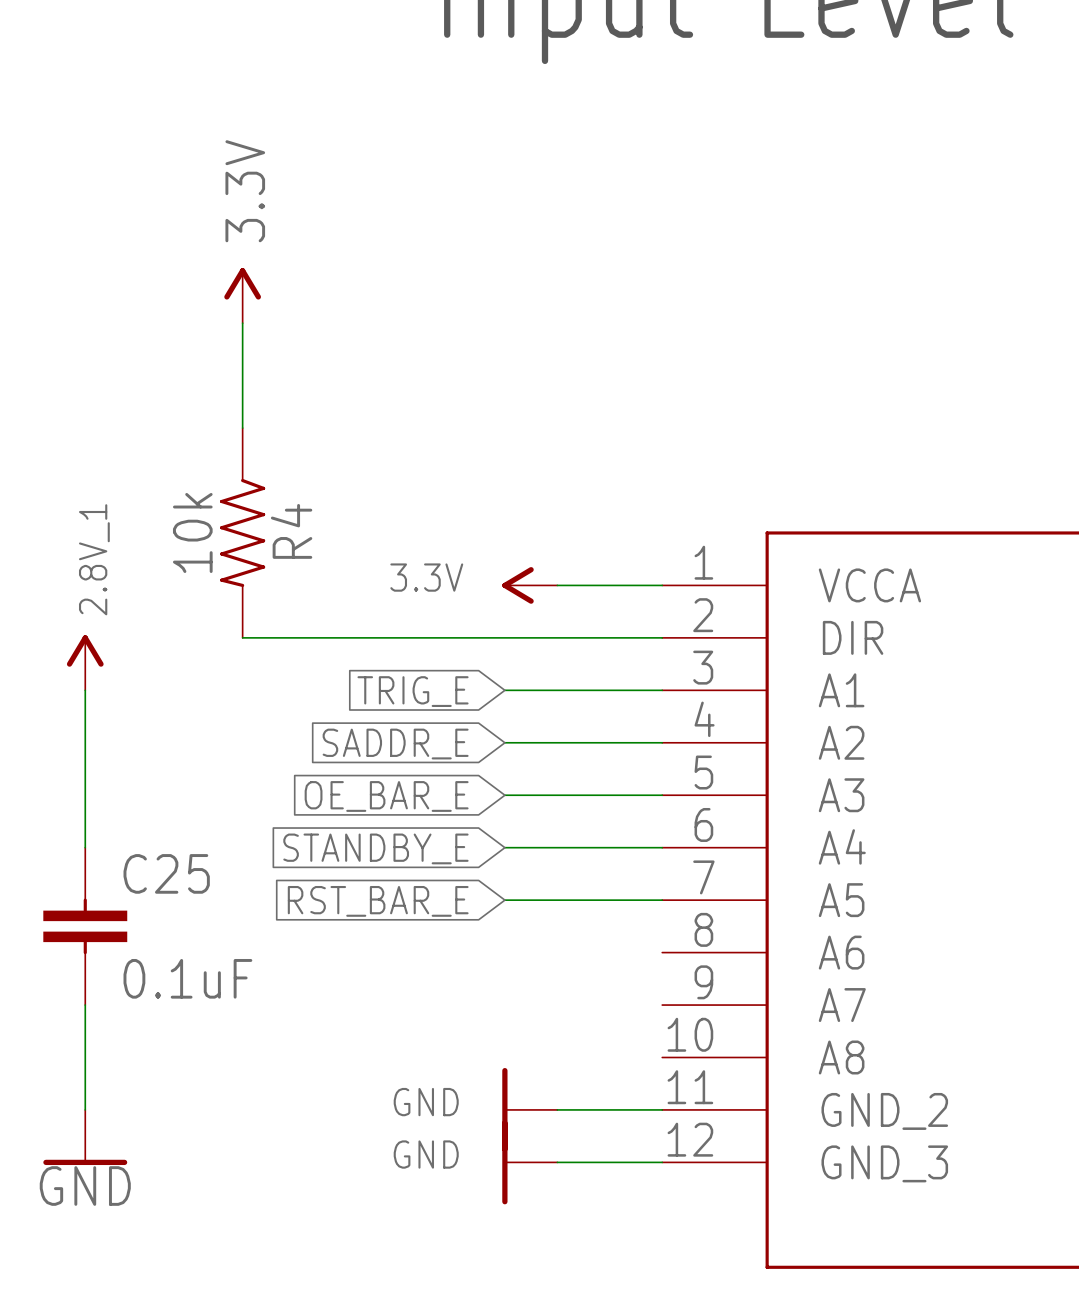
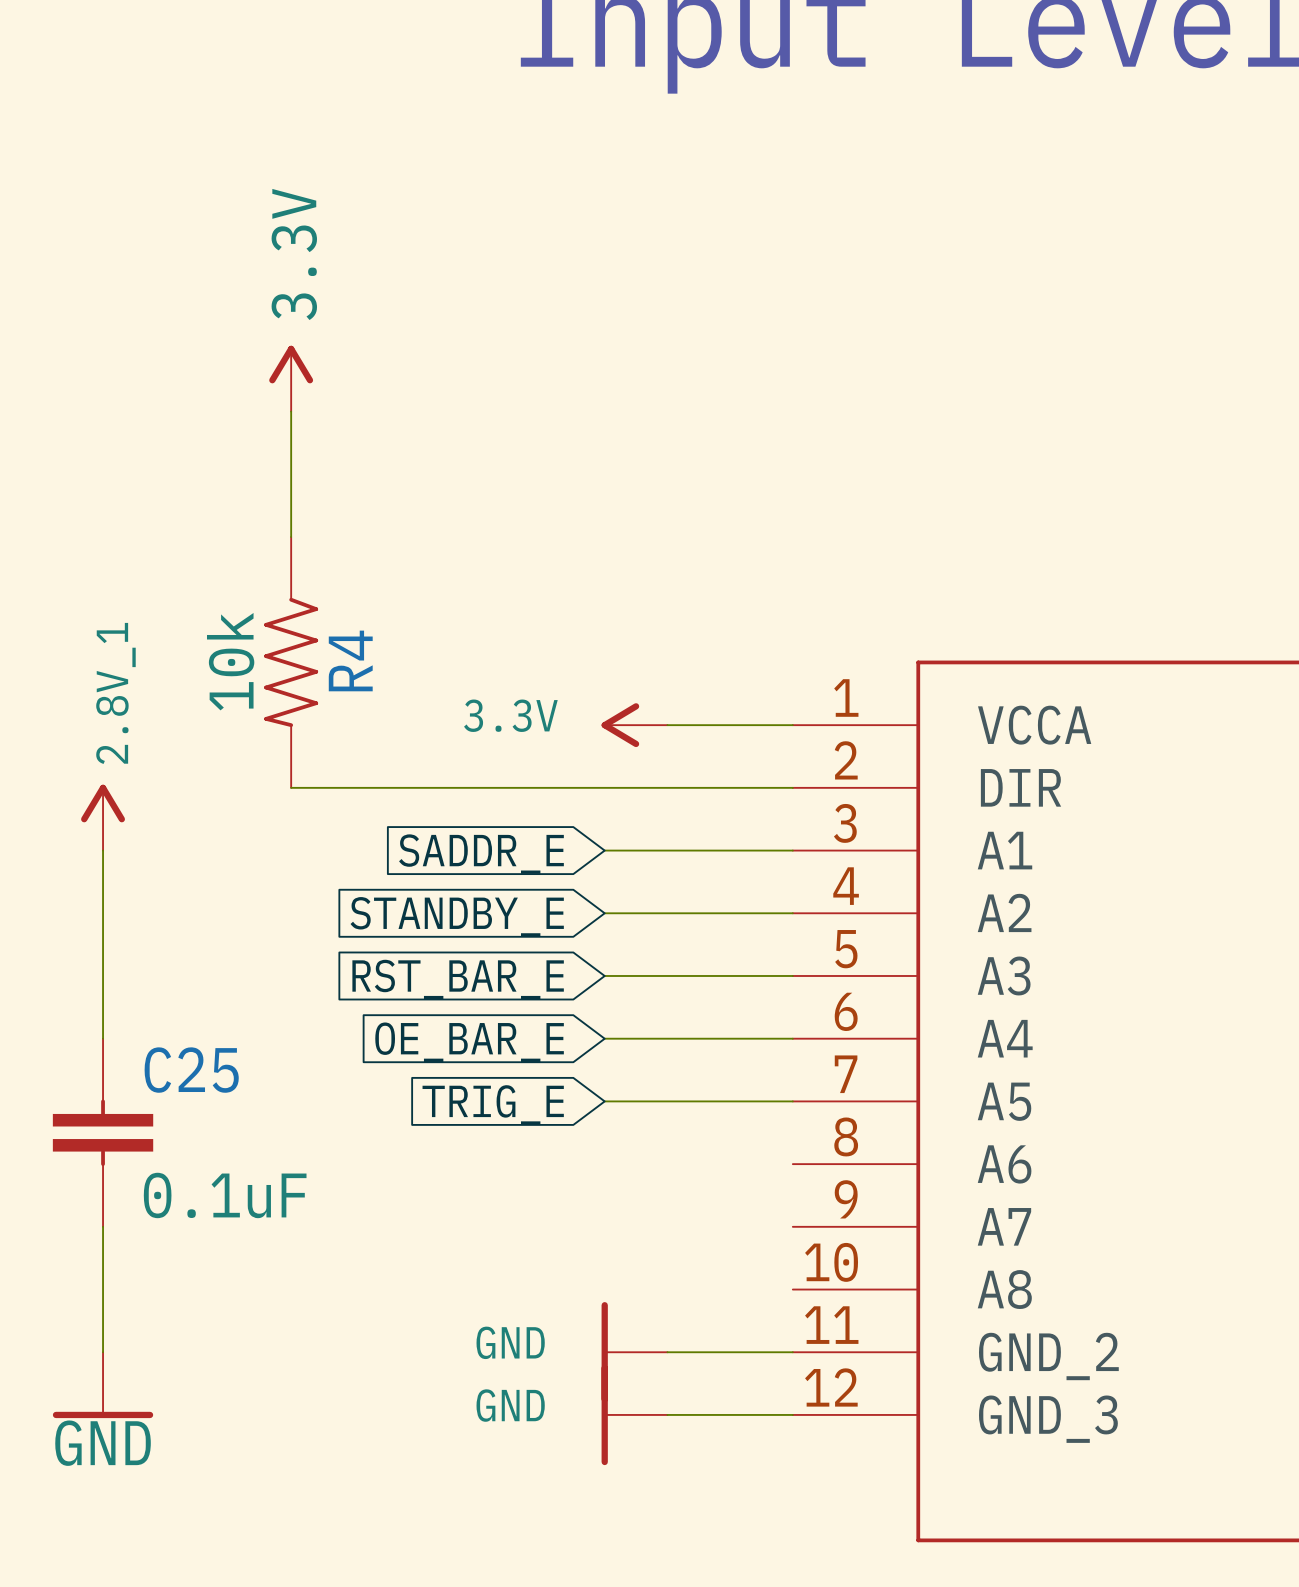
global label: TRIG_E (413, 691) -> SADDR_E (481, 854)
global label: SADDR_E (395, 744) -> STANDBY_E (457, 916)
global label: OE_BAR_E (386, 796) -> RST_BAR_E (458, 979)
global label: STANDBY_E (375, 848) -> OE_BAR_E (469, 1042)
global label: RST_BAR_E (378, 901) -> TRIG_E (493, 1104)

